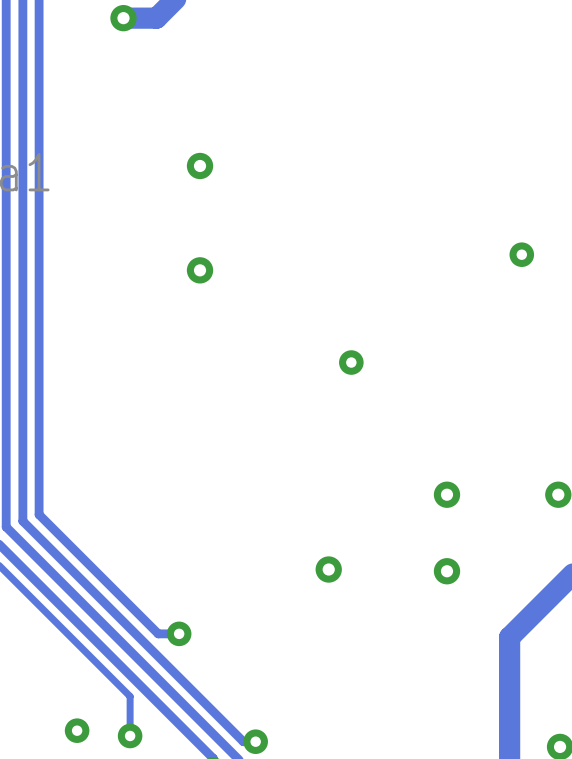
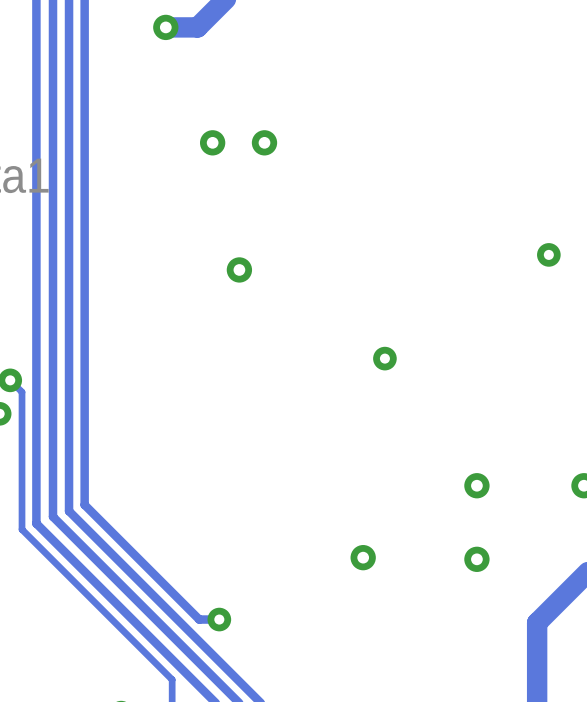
via: none -> (212, 142)
via: none -> (264, 142)
via: (200, 165) -> none

